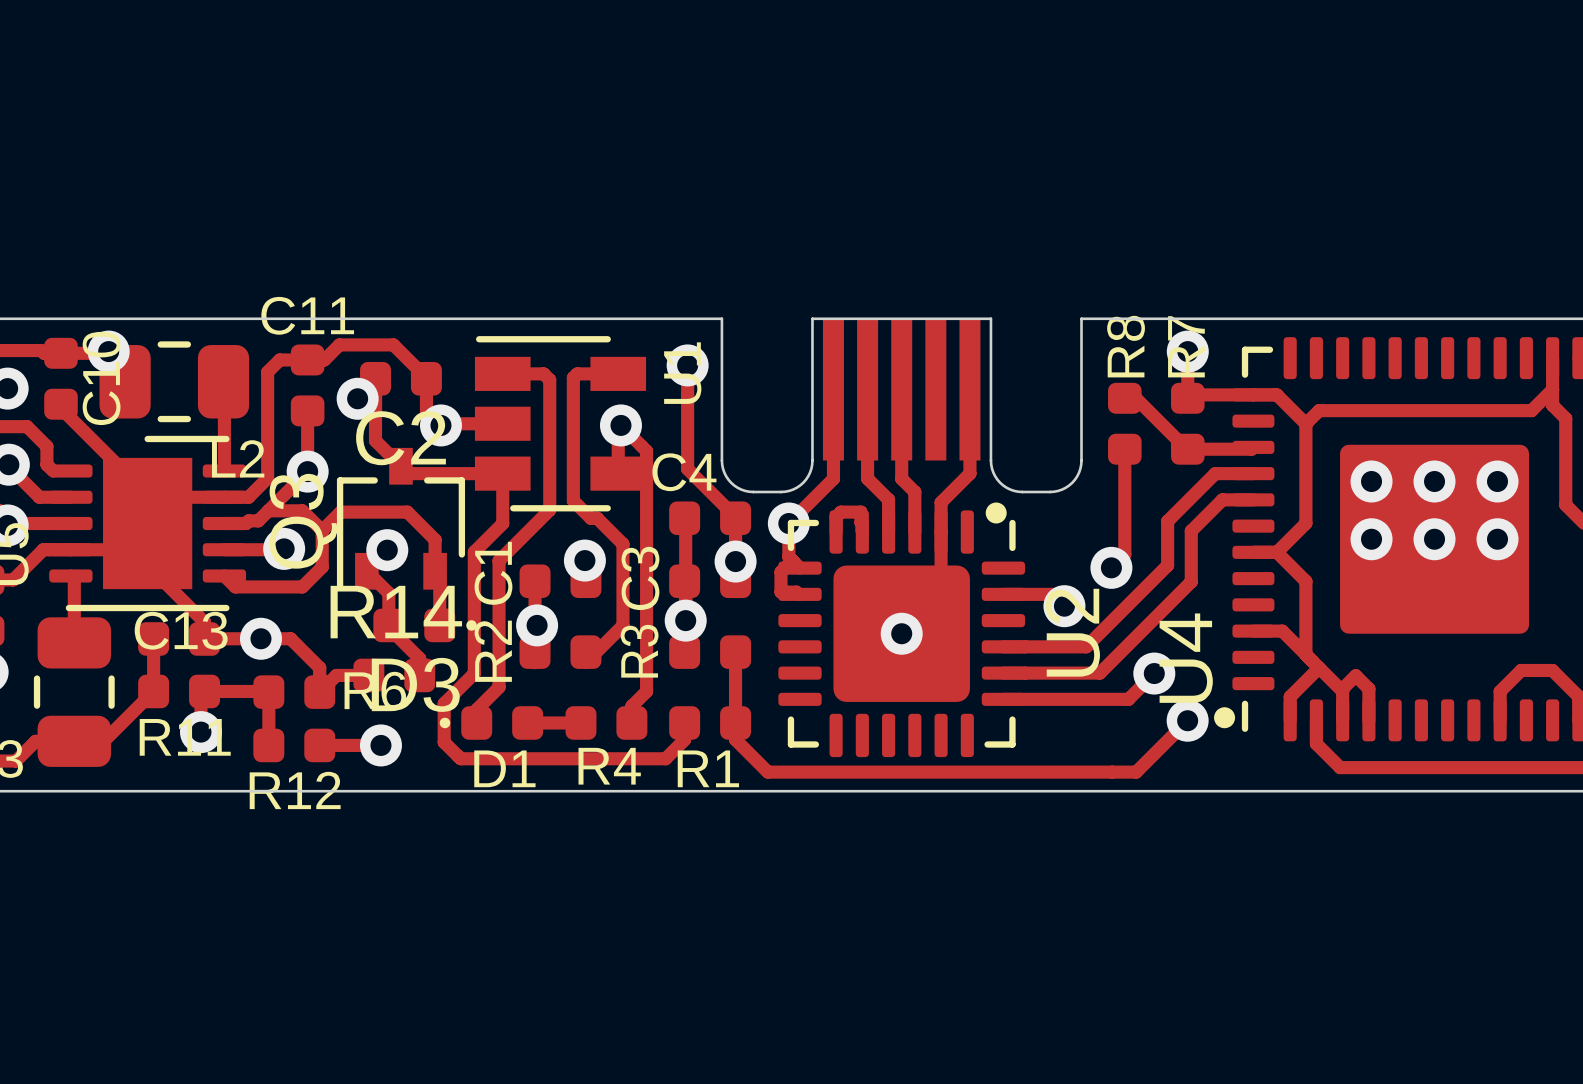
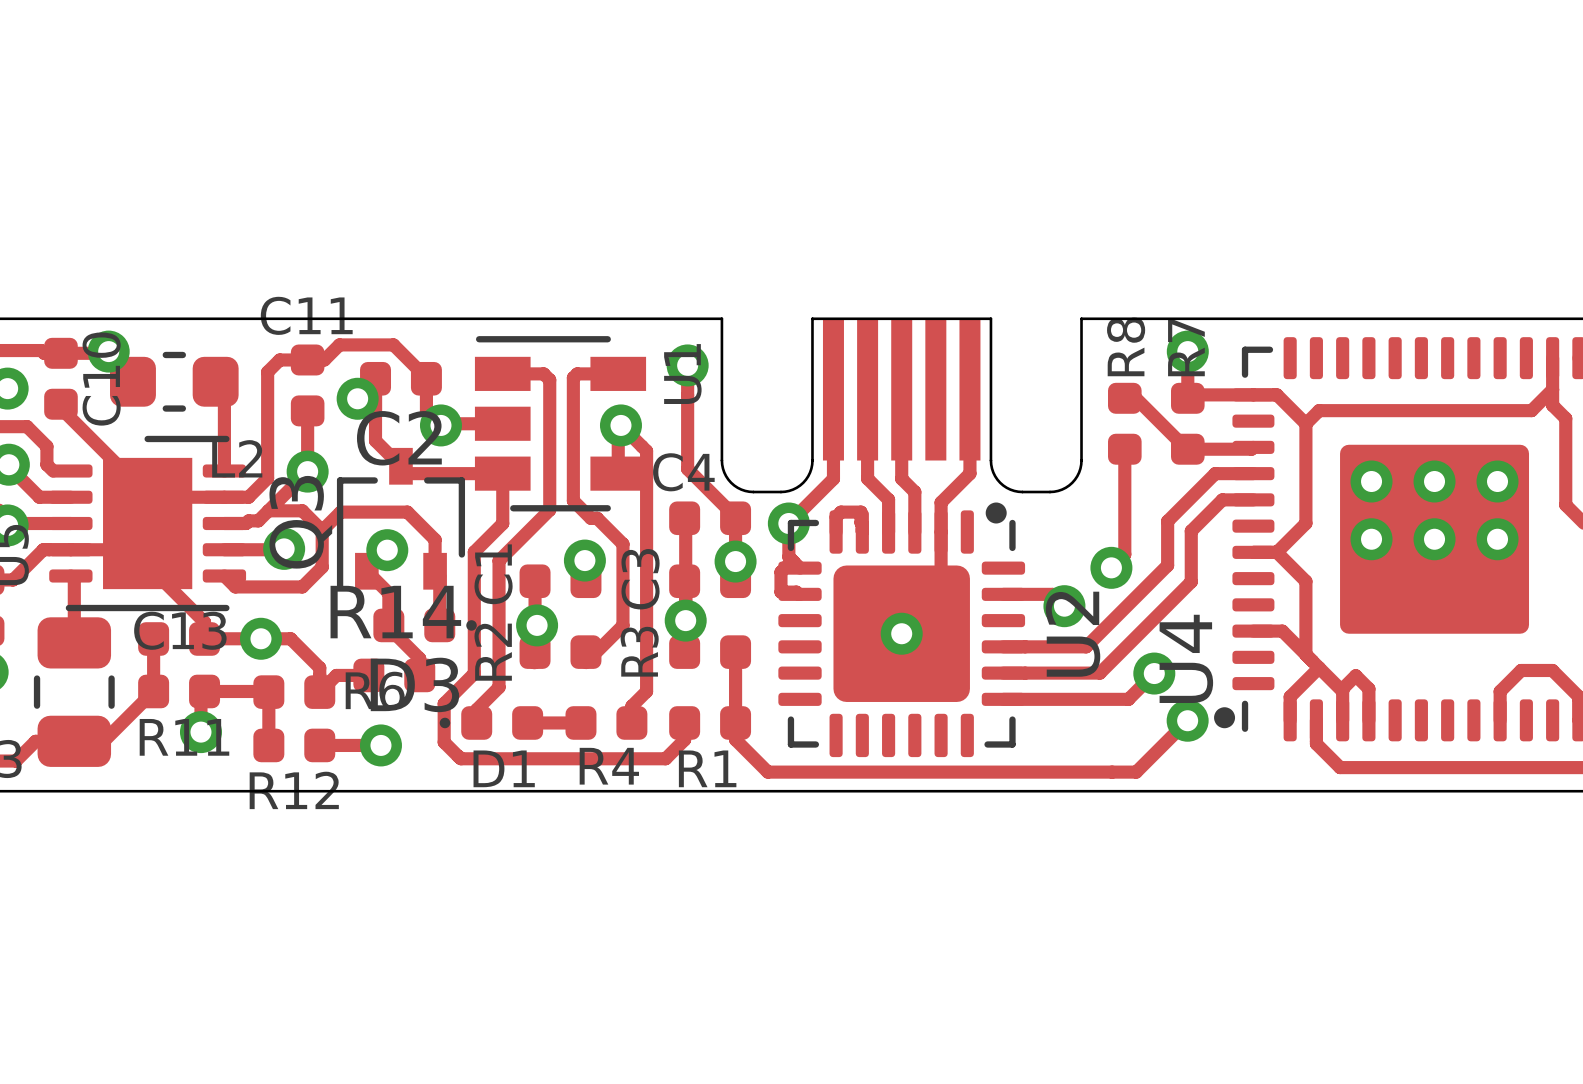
L2 footprint: [99, 341, 250, 423] -> [110, 351, 239, 412]

